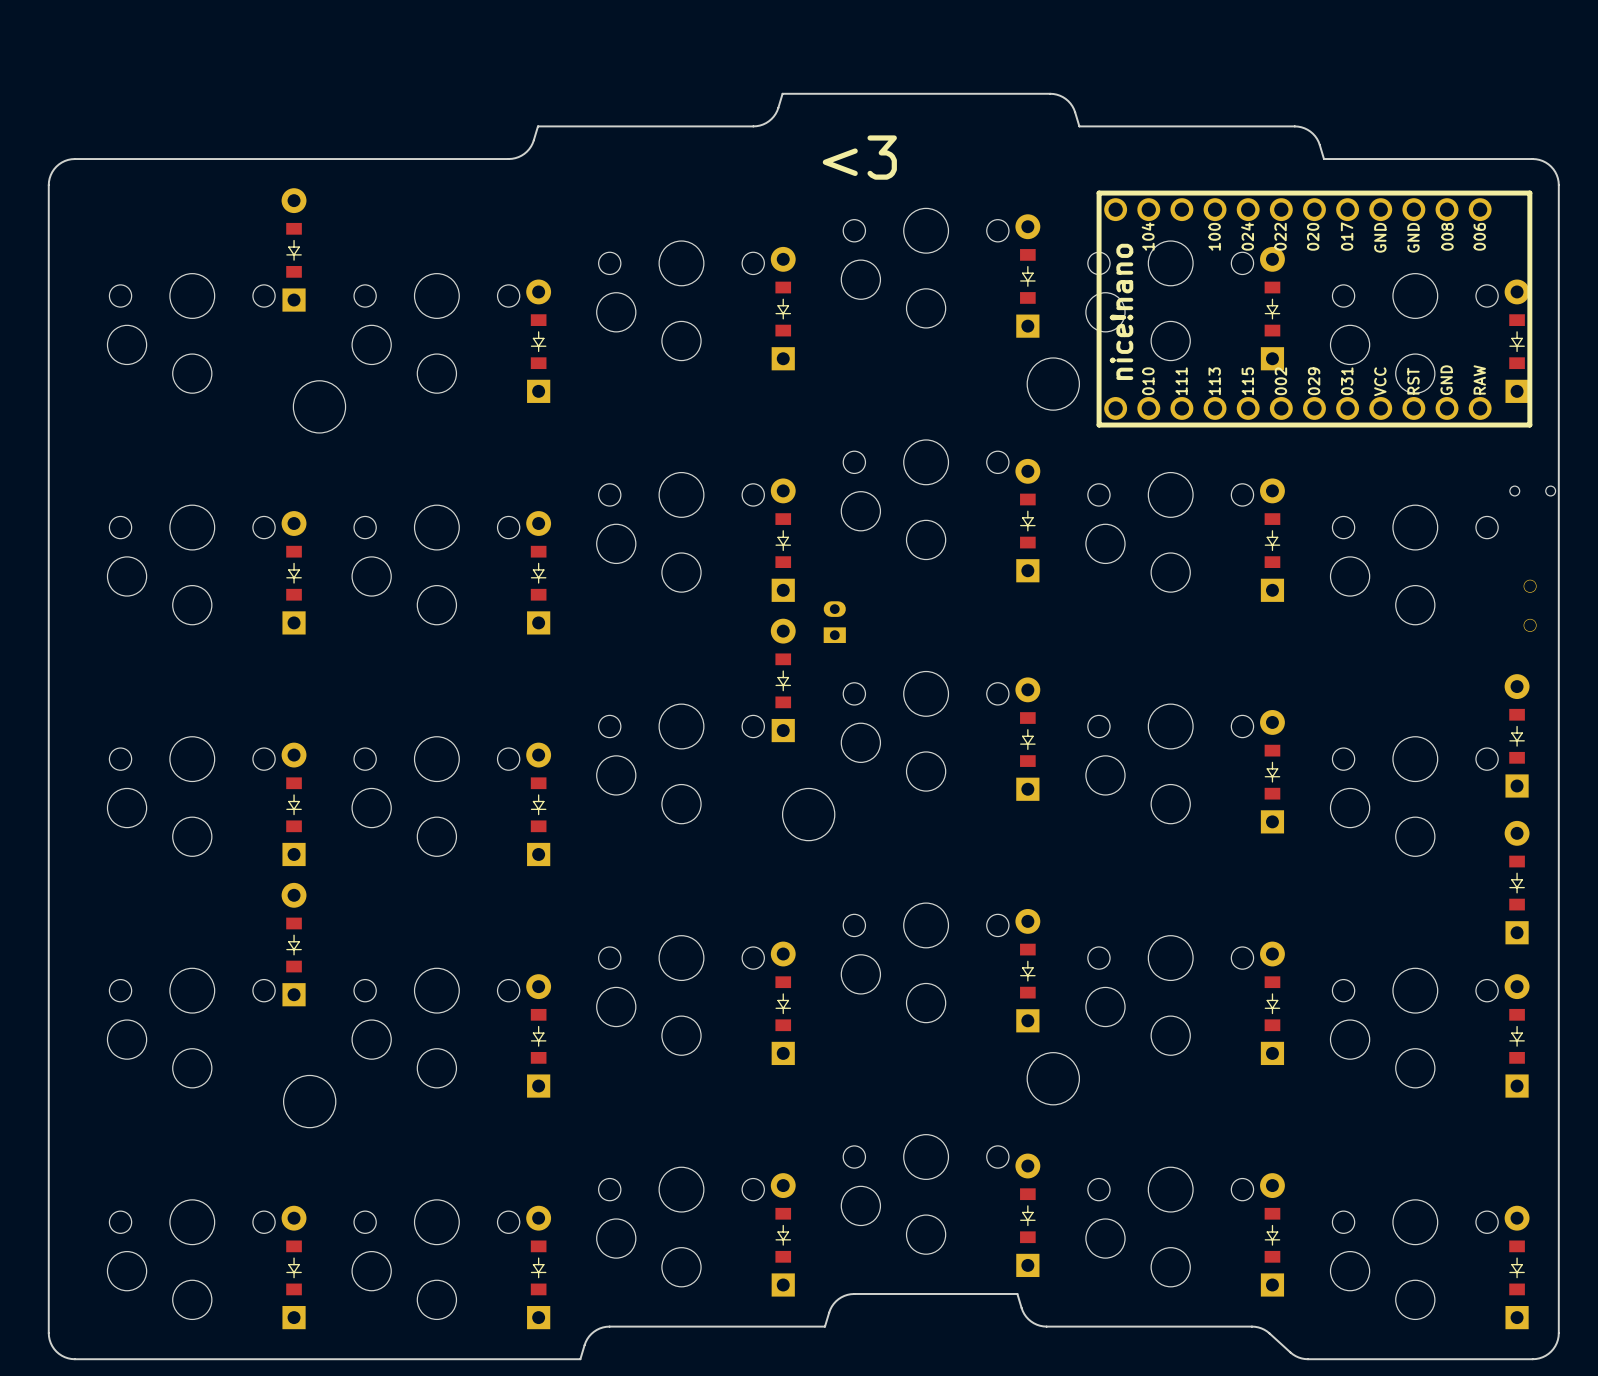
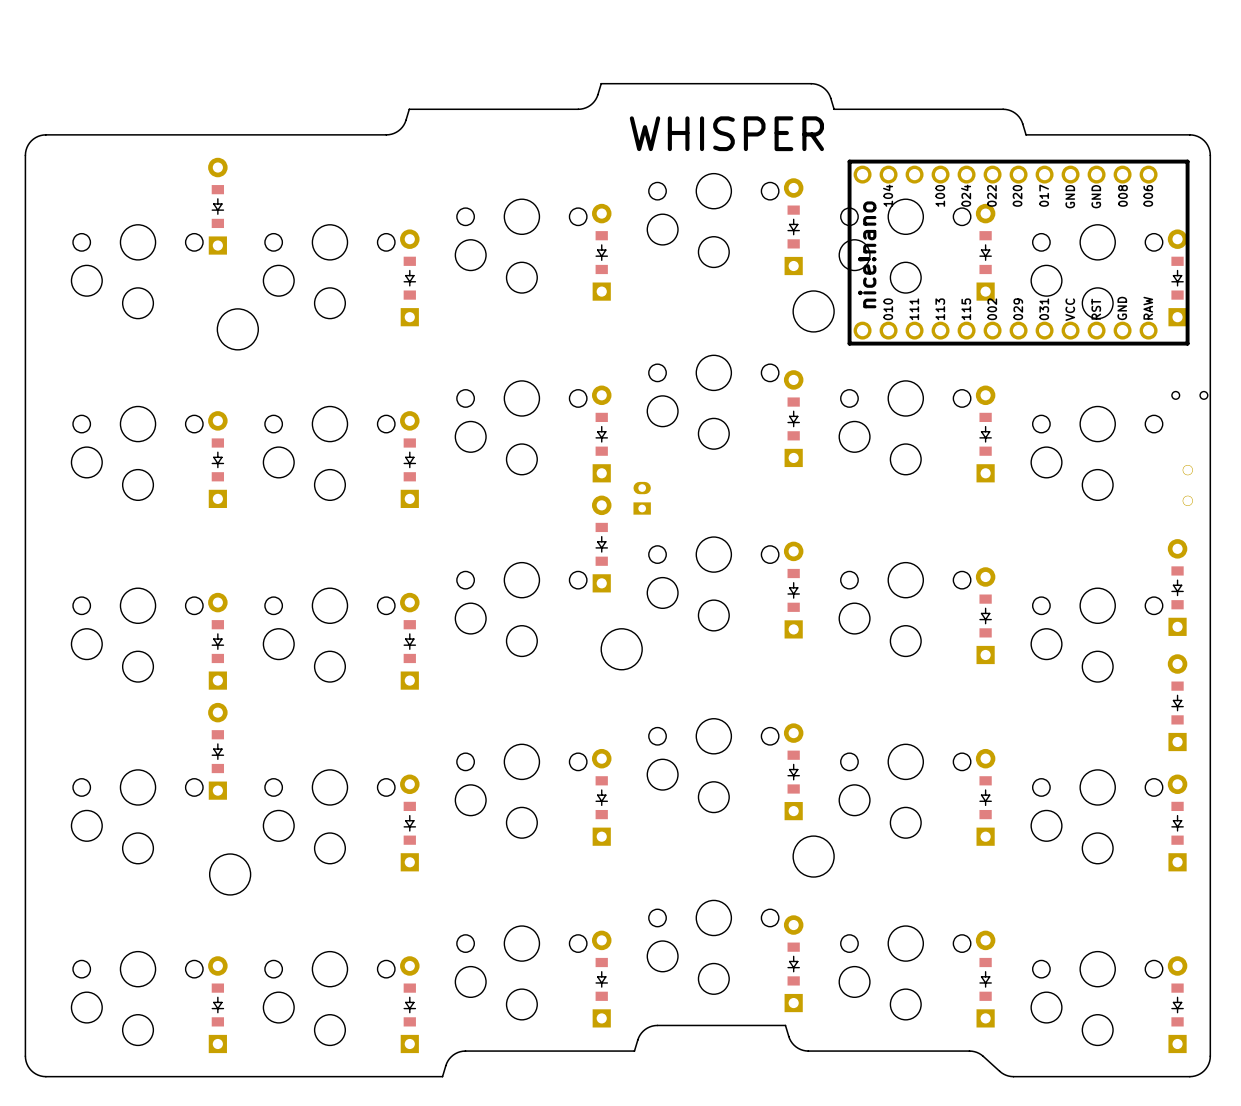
text: <3 (859, 157) -> WHISPER (726, 133)

